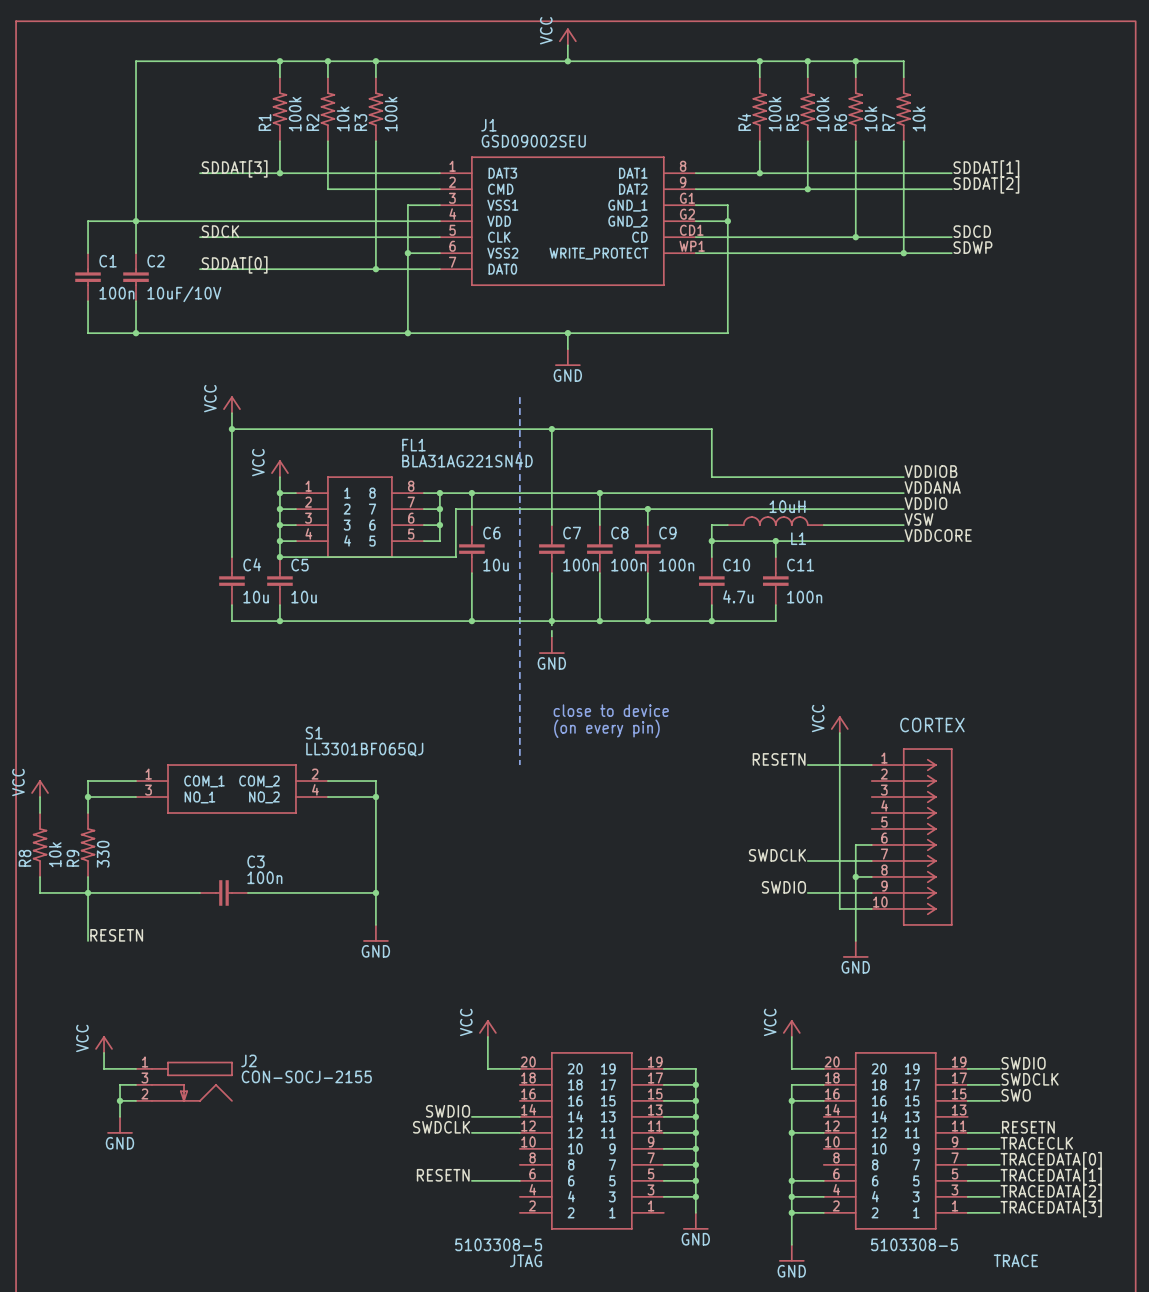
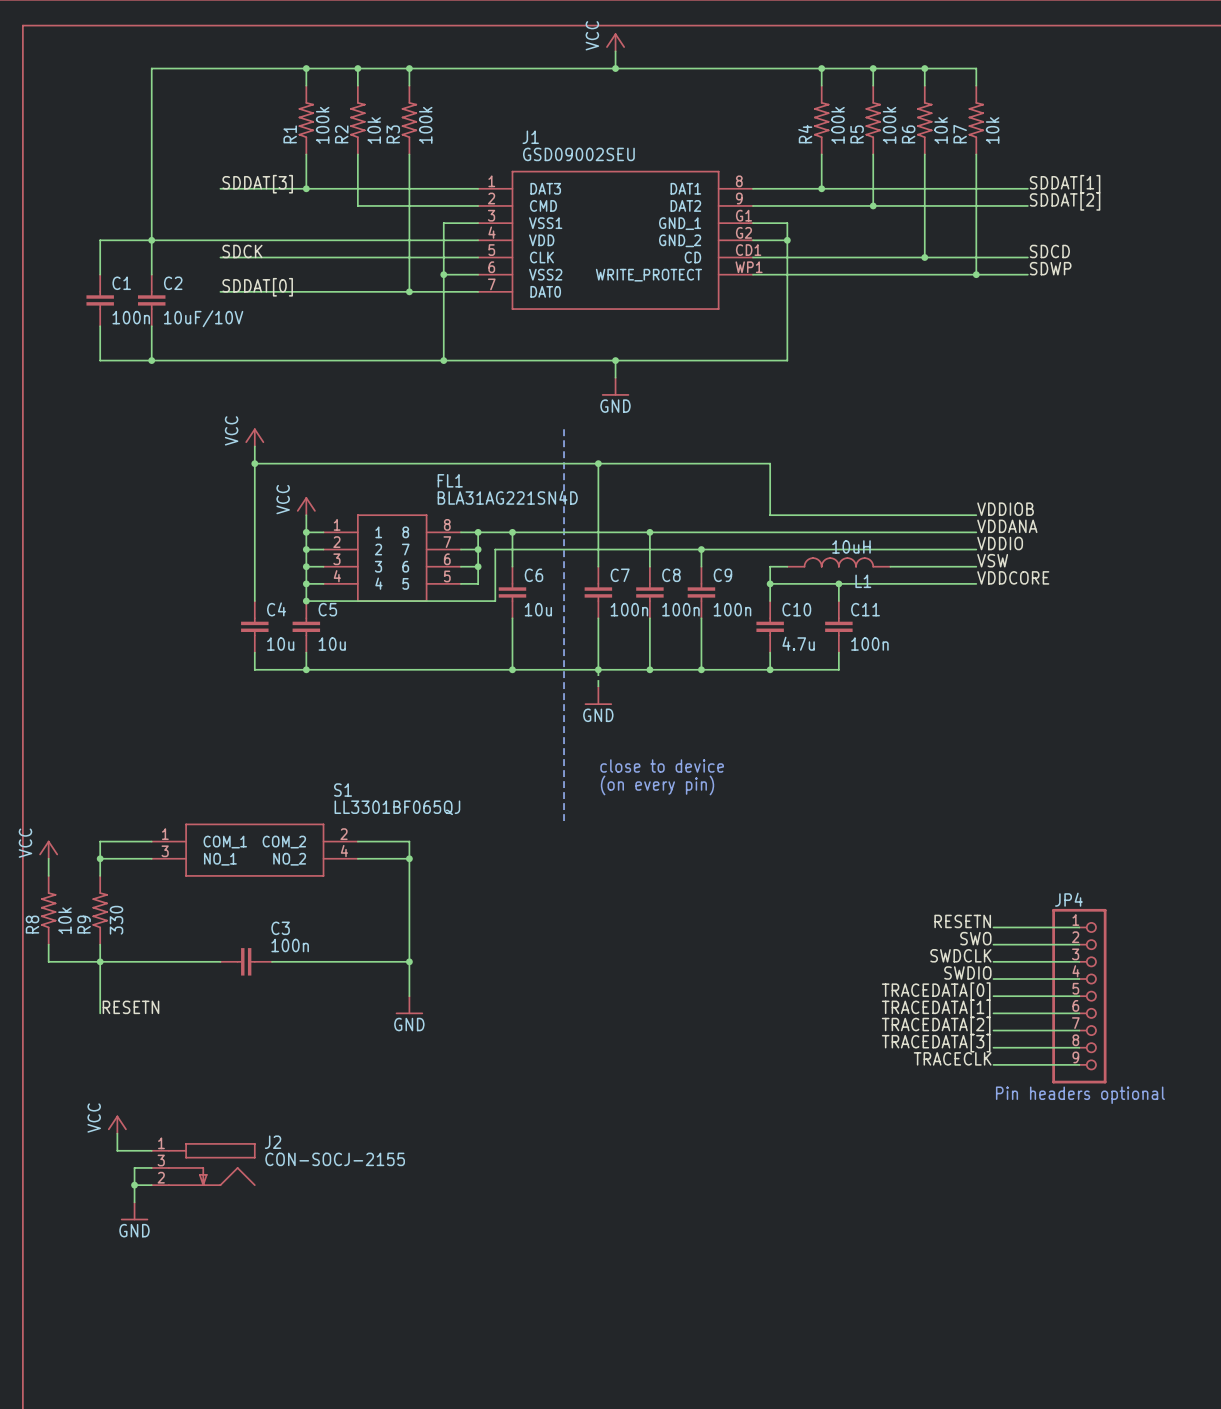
power symbol: VCC (839, 724) -> none
wire: (839, 733) (839, 908) (871, 908) -> none
label: RESETN (779, 759) -> none
wire: (807, 765) (871, 765) -> none
CORTEX: (911, 836) -> none
wire: (871, 844) (855, 844) (855, 940) -> none
label: SWDCLK (777, 855) -> none
label: none -> RESETN (962, 921)
wire: (807, 860) (871, 860) -> none
wire: none -> (993, 927) (1079, 927)
label: none -> SWO (975, 938)
wire: (855, 876) (871, 876) -> none
junction: (855, 876) -> none
wire: none -> (993, 944) (1079, 944)
label: SWDIO (783, 887) -> none
label: none -> SWDCLK (960, 955)
wire: (807, 892) (871, 892) -> none
wire: none -> (993, 961) (1079, 961)
label: none -> SWDIO (967, 972)
wire: none -> (993, 979) (1079, 979)
label: none -> TRACEDATA[0] (936, 991)
wire: none -> (993, 996) (1079, 996)
JP4: none -> (1079, 996)
label: none -> TRACEDATA[1] (936, 1008)
wire: none -> (993, 1013) (1079, 1013)
power symbol: GND (855, 949) -> none
label: none -> TRACEDATA[2] (936, 1025)
wire: none -> (993, 1030) (1079, 1030)
label: none -> TRACEDATA[3] (936, 1043)
wire: none -> (993, 1047) (1079, 1047)
label: none -> TRACECLK (952, 1058)
wire: none -> (993, 1064) (1079, 1064)
text: none -> Pin headers optional (1080, 1095)
power symbol: VCC (487, 1028) -> none
power symbol: VCC (791, 1028) -> none
wire: (487, 1036) (487, 1068) (519, 1068) -> none
wire: (791, 1036) (791, 1068) (823, 1068) -> none
label: SWDIO (1023, 1063) -> none
wire: (663, 1068) (695, 1068) (695, 1212) -> none
wire: (967, 1068) (999, 1068) -> none
label: SWDCLK (1030, 1079) -> none
wire: (663, 1084) (695, 1084) -> none
junction: (695, 1084) -> none
wire: (823, 1084) (791, 1084) (791, 1244) -> none
wire: (967, 1084) (999, 1084) -> none
label: SWO (1016, 1095) -> none
wire: (663, 1100) (695, 1100) -> none
junction: (695, 1100) -> none
wire: (791, 1100) (823, 1100) -> none
junction: (791, 1100) -> none
wire: (967, 1100) (999, 1100) -> none
label: SWDIO (448, 1111) -> none
wire: (471, 1116) (519, 1116) -> none
wire: (663, 1116) (695, 1116) -> none
junction: (695, 1116) -> none
label: SWDCLK (441, 1127) -> none
label: RESETN (1028, 1127) -> none
wire: (471, 1132) (519, 1132) -> none
wire: (663, 1132) (695, 1132) -> none
junction: (695, 1132) -> none
wire: (791, 1132) (823, 1132) -> none
junction: (791, 1132) -> none
wire: (967, 1132) (999, 1132) -> none
JTAG: 5103308-5 (591, 1140) -> none
TRACE: 5103308-5 (895, 1140) -> none
label: TRACECLK (1036, 1143) -> none
wire: (663, 1148) (695, 1148) -> none
junction: (695, 1148) -> none
wire: (967, 1148) (999, 1148) -> none
label: TRACEDATA[0] (1051, 1160) -> none
wire: (663, 1164) (695, 1164) -> none
junction: (695, 1164) -> none
wire: (967, 1164) (999, 1164) -> none
label: RESETN (443, 1175) -> none
label: TRACEDATA[1] (1051, 1176) -> none
wire: (471, 1180) (519, 1180) -> none
wire: (663, 1180) (695, 1180) -> none
junction: (695, 1180) -> none
wire: (791, 1180) (823, 1180) -> none
junction: (791, 1180) -> none
wire: (967, 1180) (999, 1180) -> none
label: TRACEDATA[2] (1051, 1192) -> none
wire: (663, 1196) (695, 1196) -> none
junction: (695, 1196) -> none
wire: (791, 1196) (823, 1196) -> none
junction: (791, 1196) -> none
wire: (967, 1196) (999, 1196) -> none
label: TRACEDATA[3] (1051, 1208) -> none
wire: (791, 1212) (823, 1212) -> none
junction: (791, 1212) -> none
wire: (967, 1212) (999, 1212) -> none
power symbol: GND (695, 1221) -> none
power symbol: GND (791, 1253) -> none

